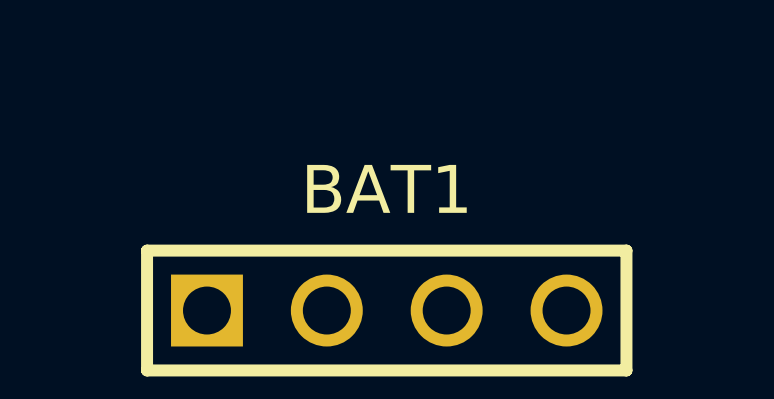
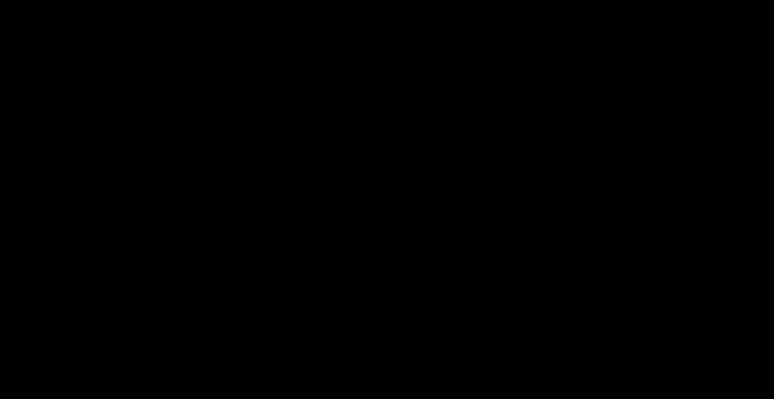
BAT1: (386, 310) -> none

